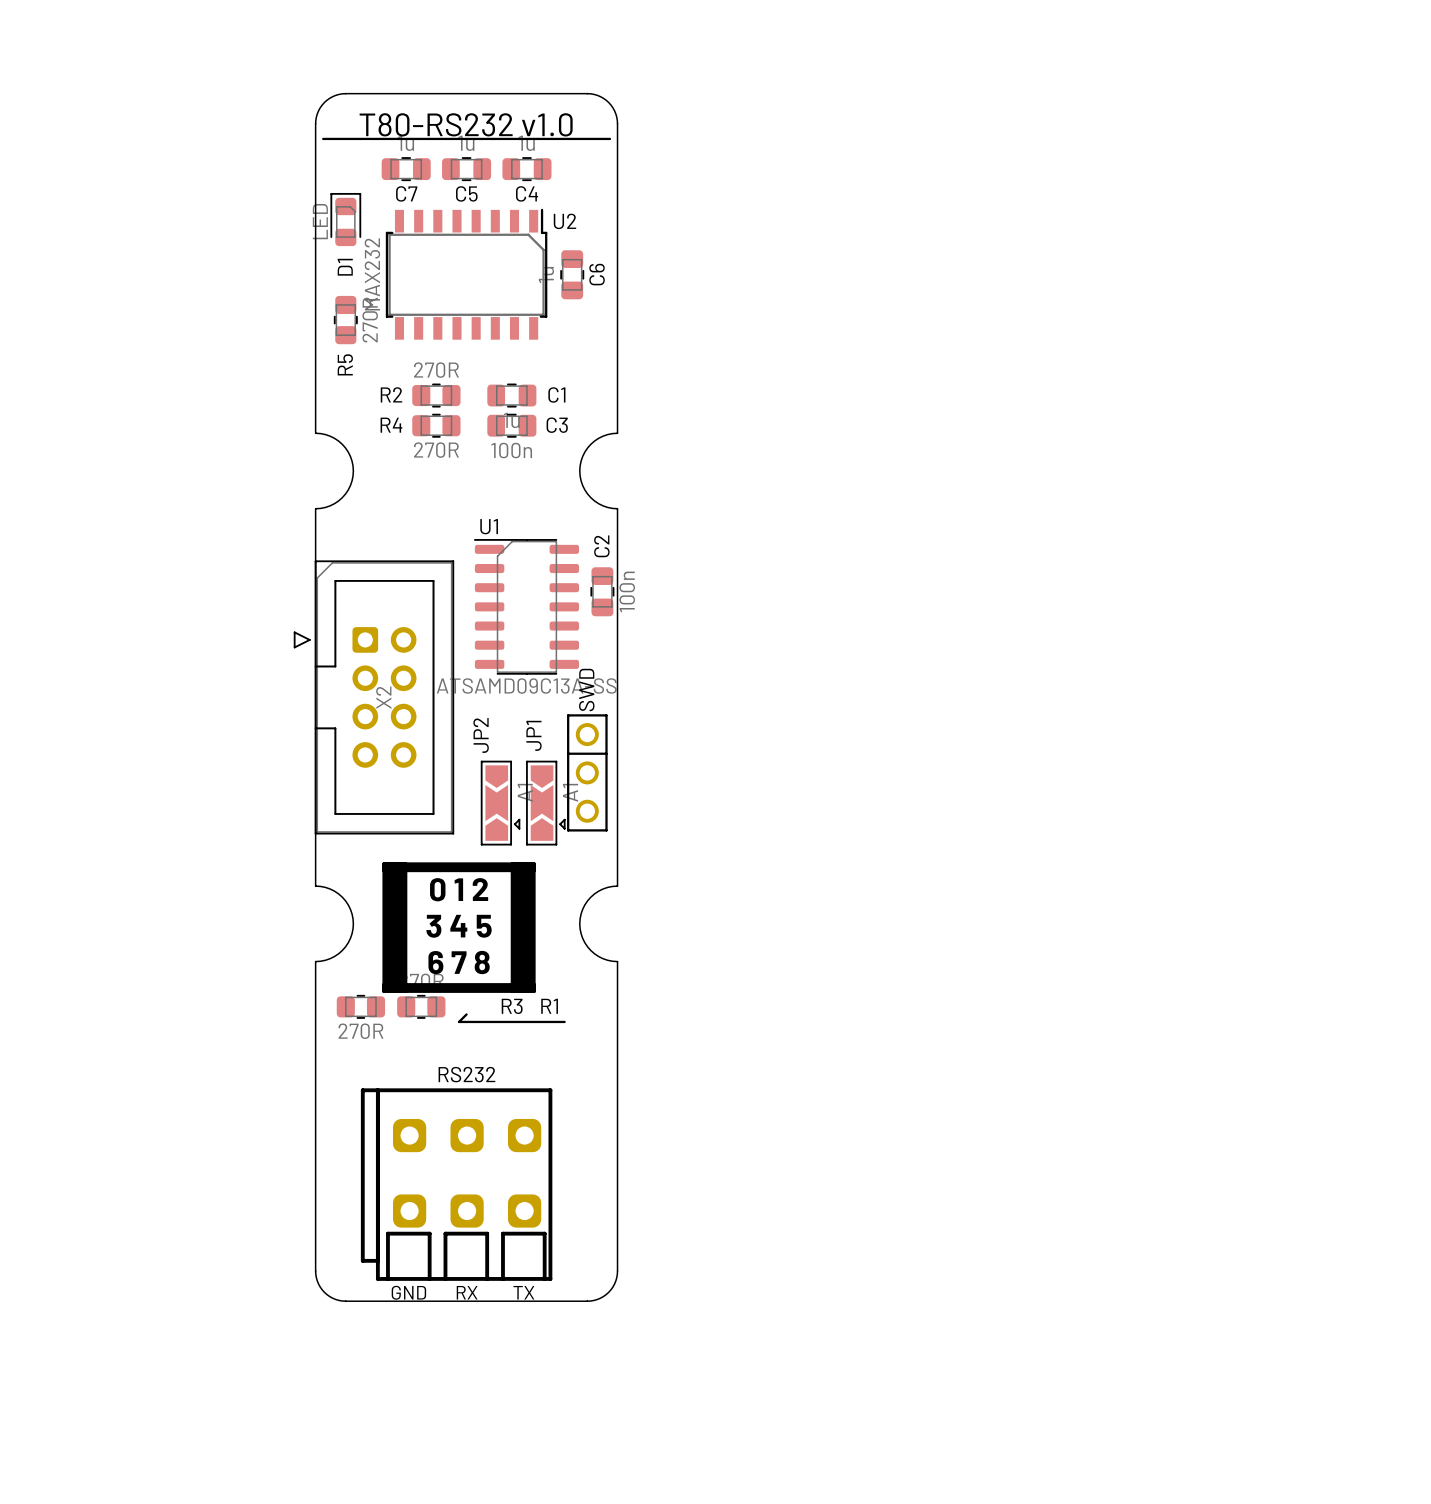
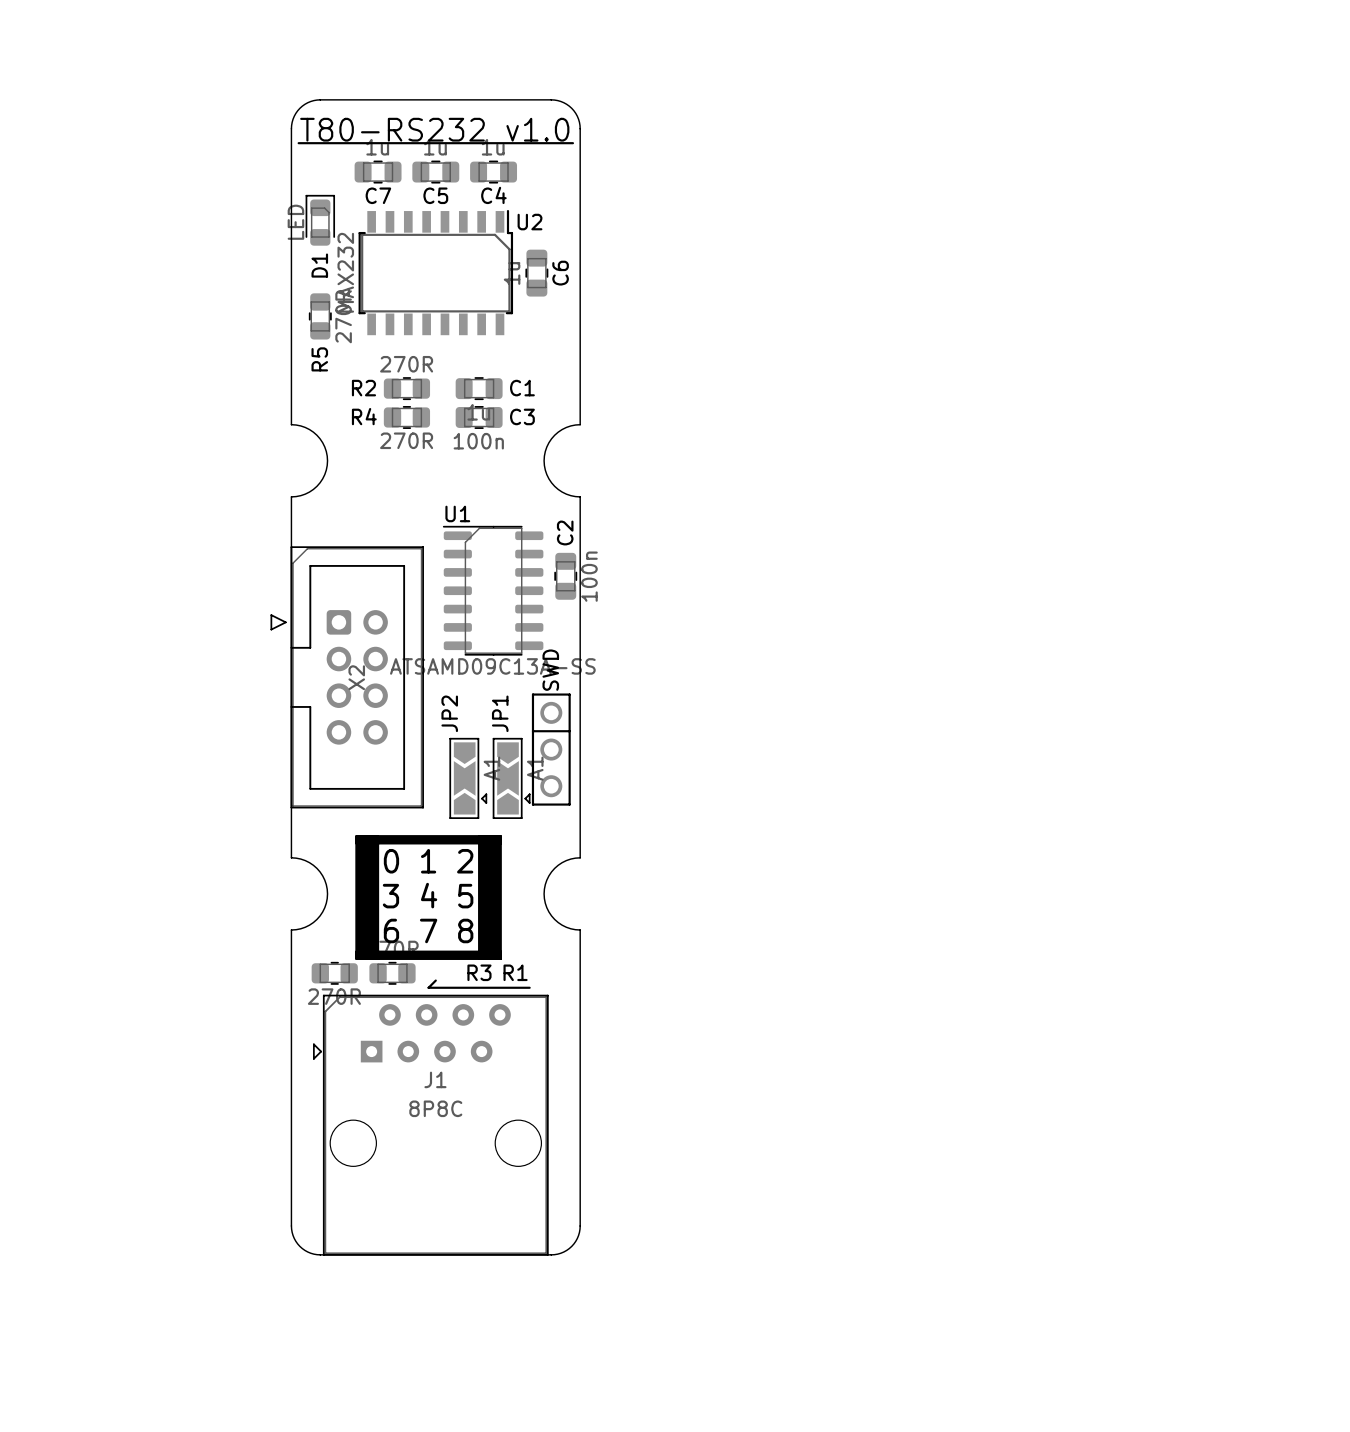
J1: none -> 8P8C (430, 1125)
part: RS232 (456, 1184) -> none
text: GND (408, 1292) -> none
text: RX (467, 1292) -> none
text: TX (523, 1292) -> none

